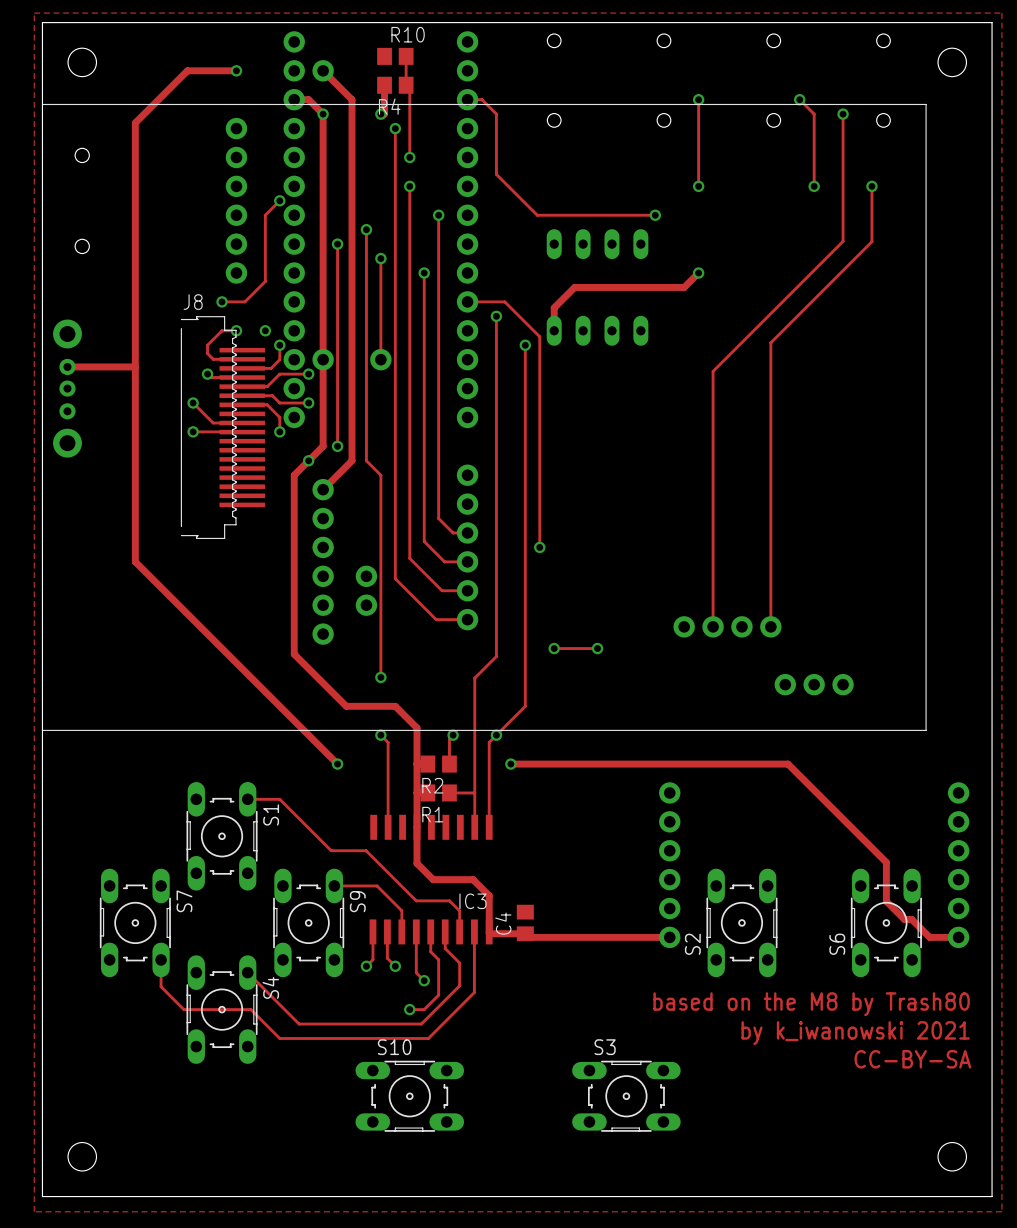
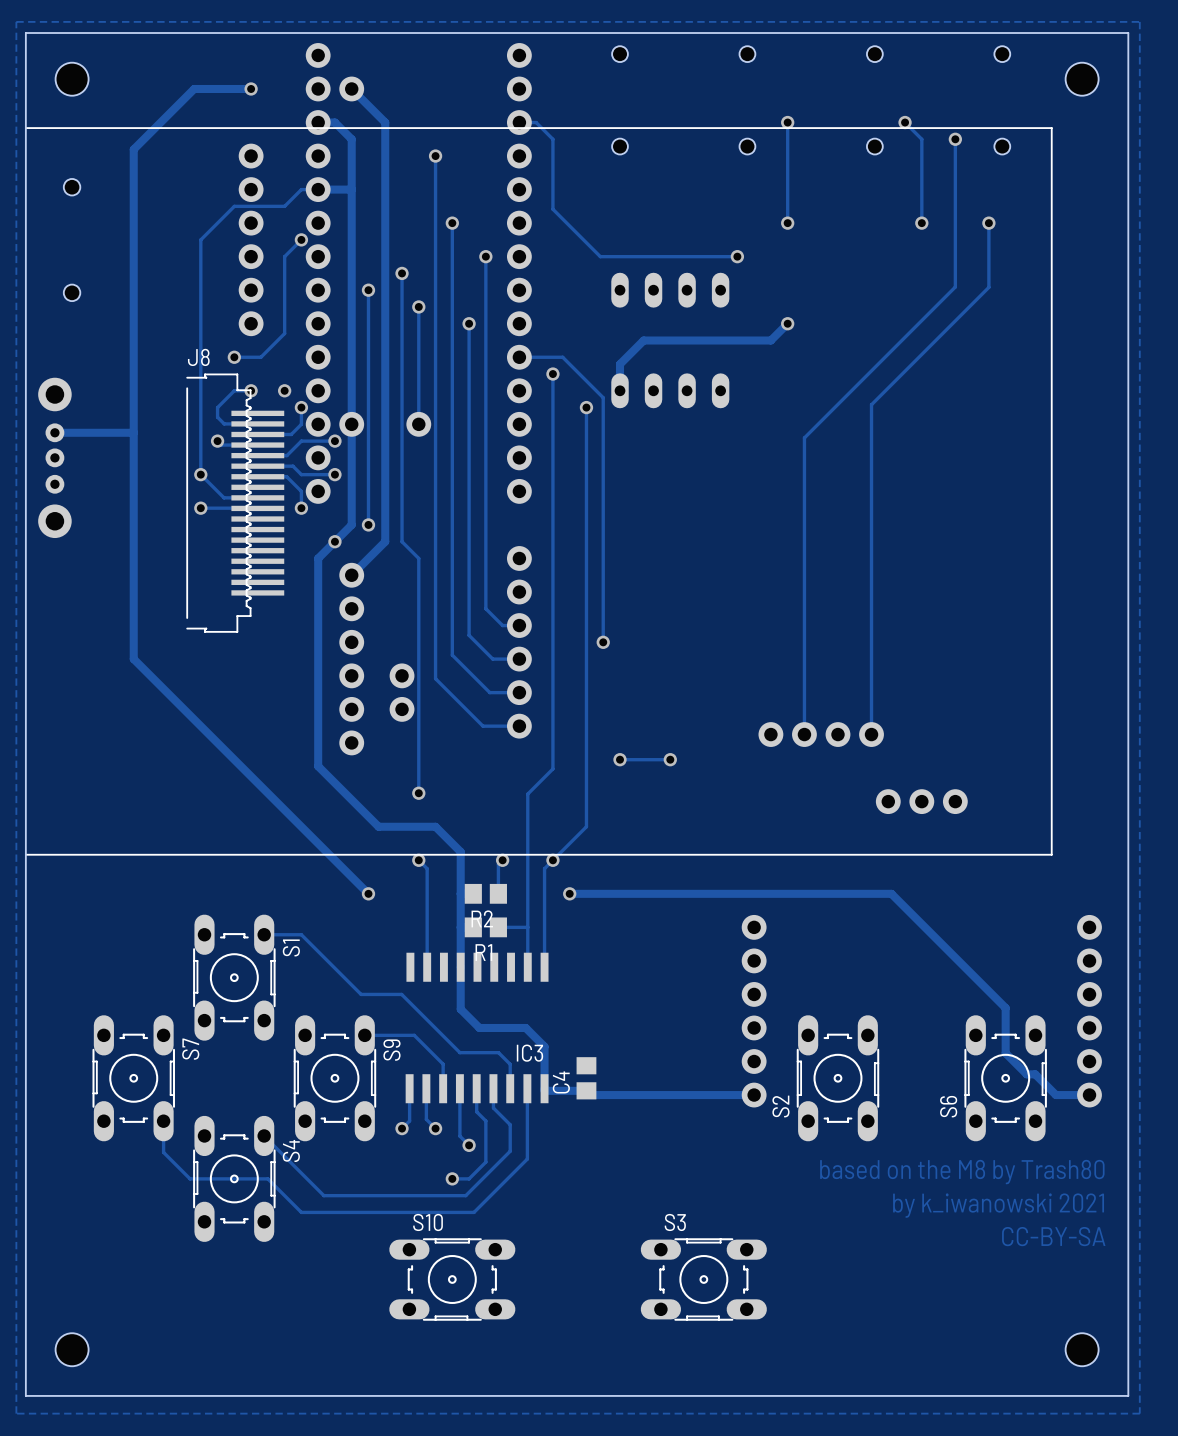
R10: (395, 56) -> none
track: (406, 56) (406, 85) (409, 85) (409, 157) -> none
track: (384, 85) (384, 114) (380, 114) -> none
R4: (395, 85) -> none
via: (323, 114) -> none
via: (380, 114) -> none
track: none -> (351, 189) (301, 189) (284, 206) (234, 206) (200, 239) (200, 474)
via: (409, 157) -> none

